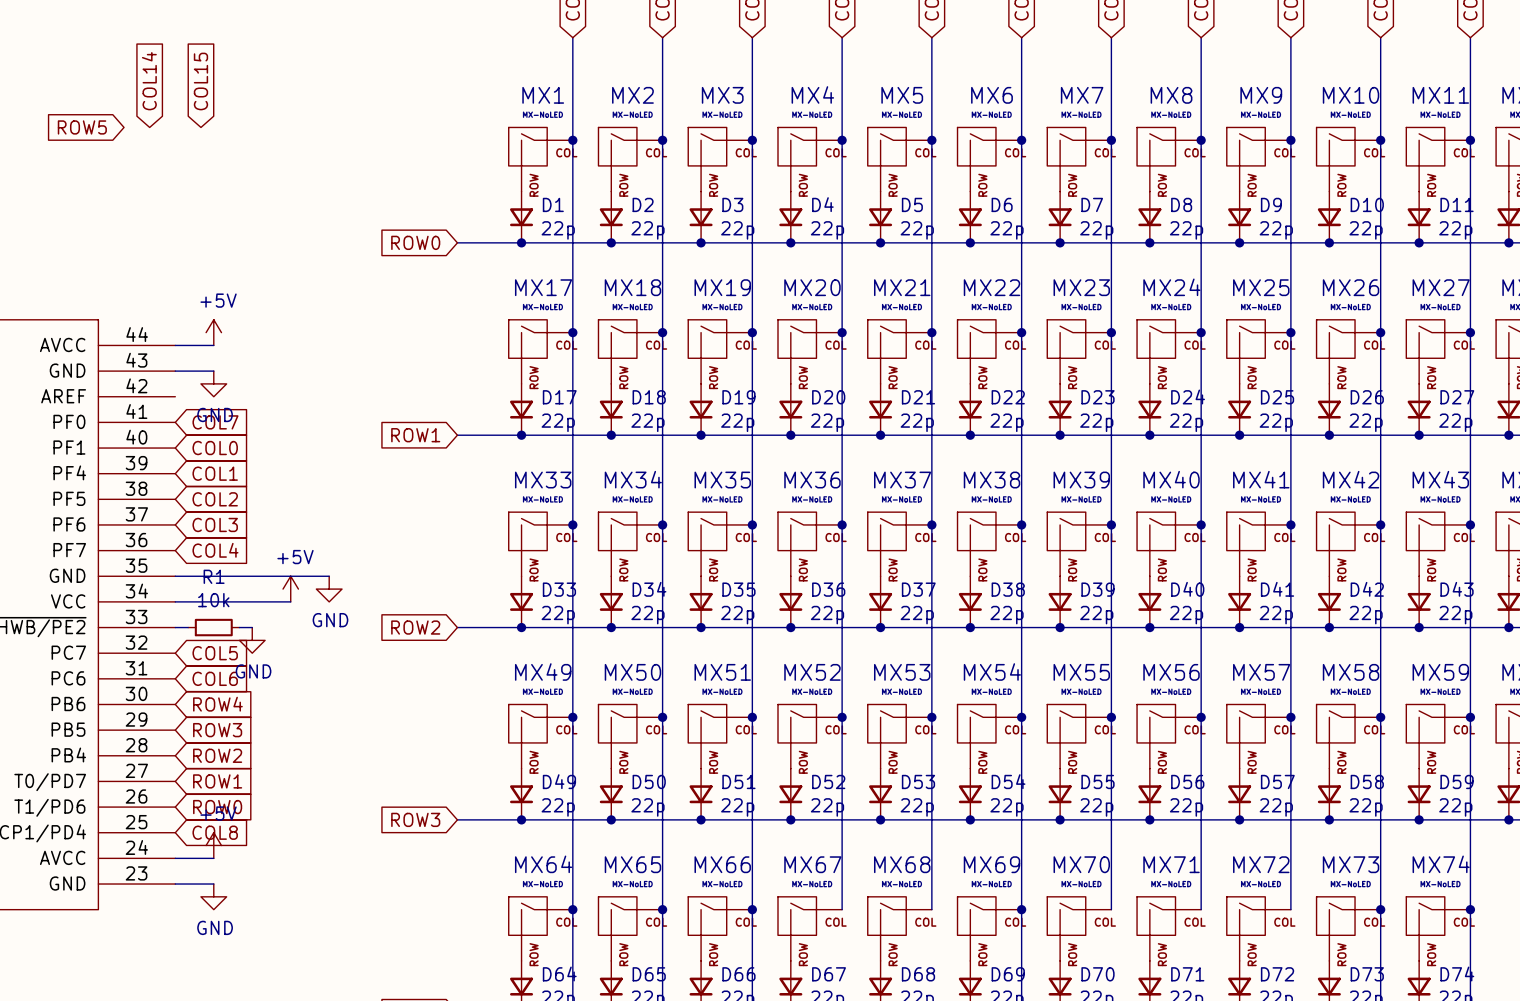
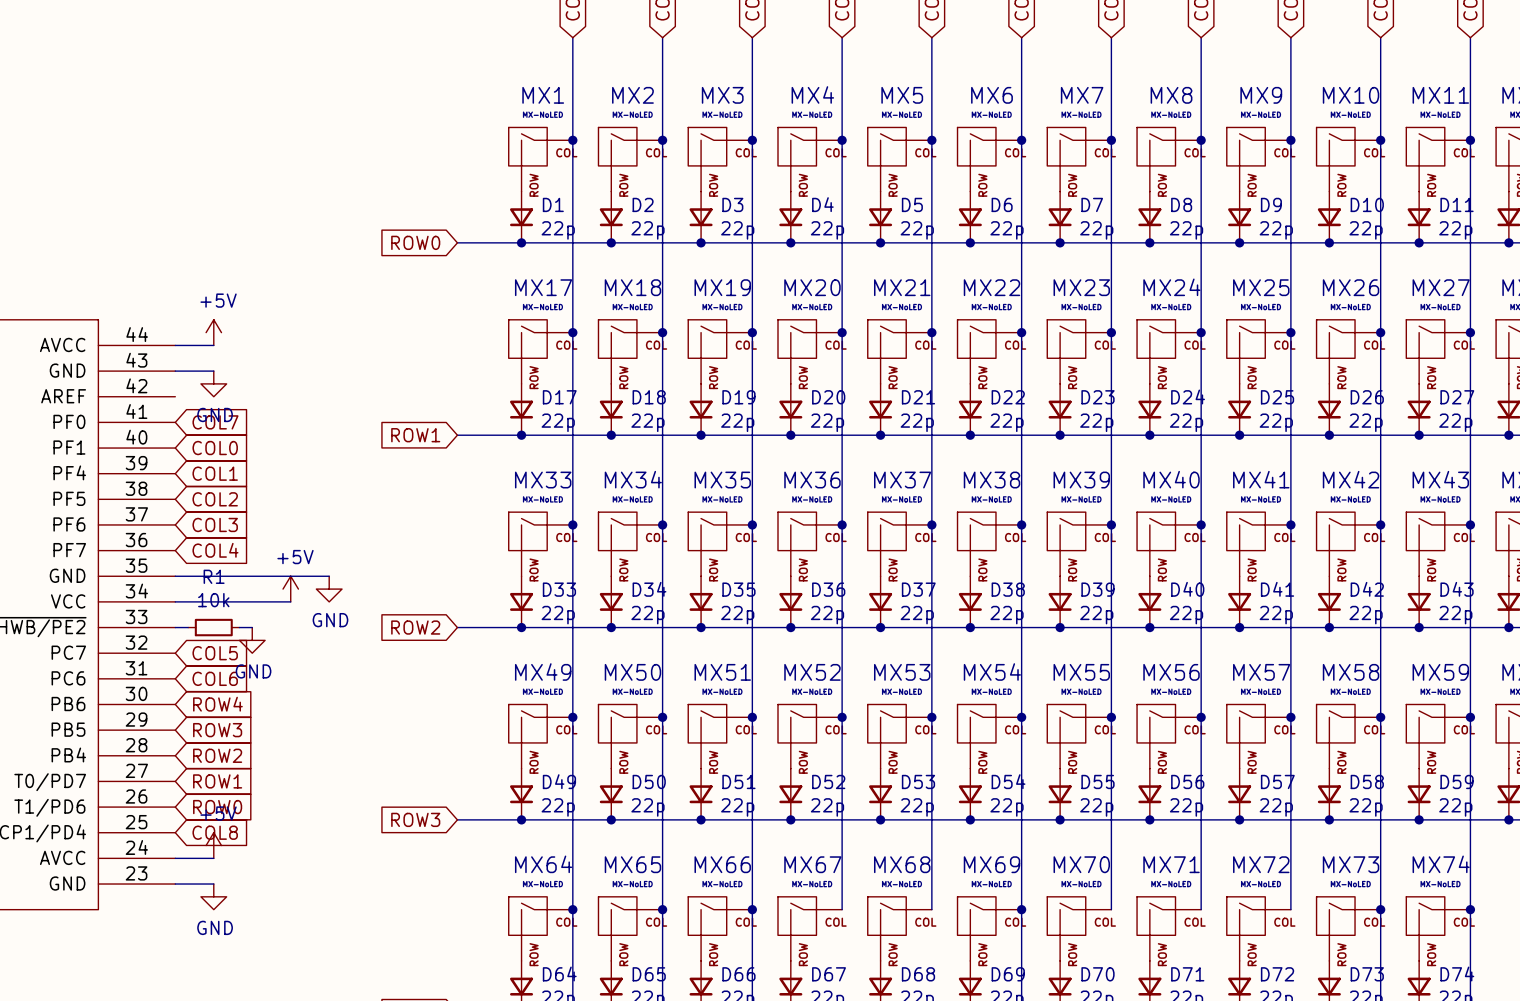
global label: COL14 (149, 81) -> none
global label: COL15 (200, 81) -> none
global label: ROW5 (82, 127) -> none

